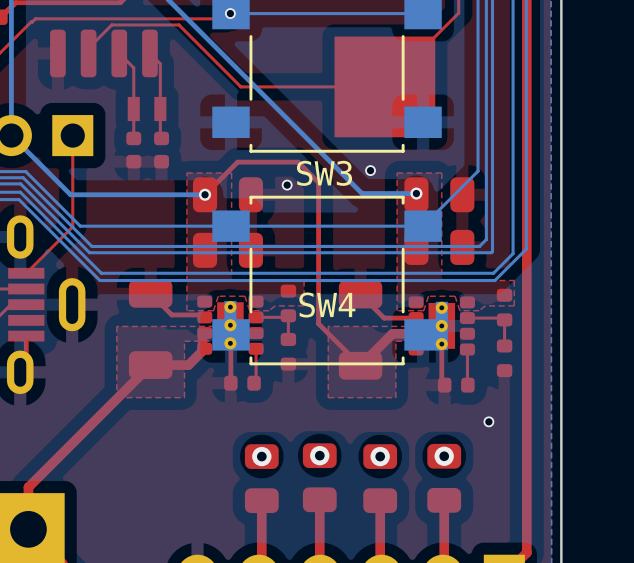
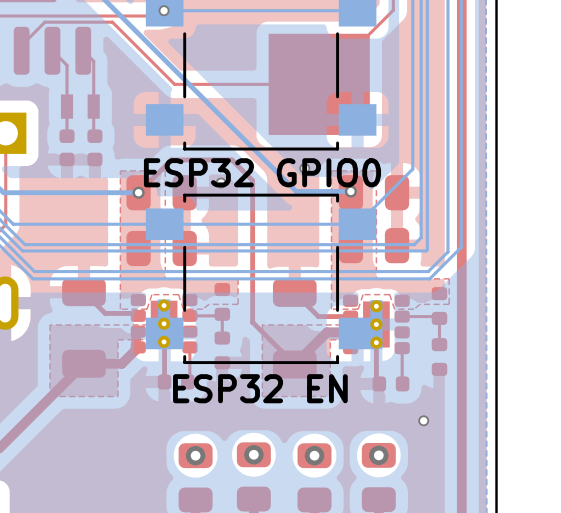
SW3 name: SW3 (324, 173) -> none
text: none -> ESP32 GPIO0 (262, 172)
SW4 name: SW4 (327, 305) -> none
text: none -> ESP32 EN (260, 388)

